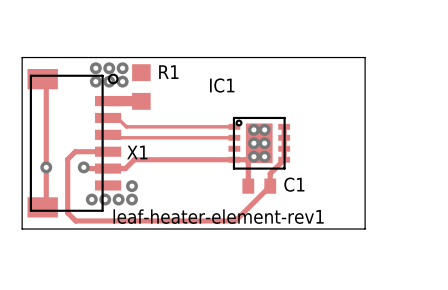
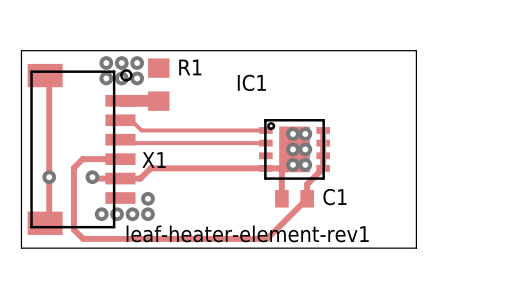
via: (253, 129) -> none
via: none -> (292, 133)
via: (264, 129) -> none
via: none -> (305, 133)
via: (253, 143) -> none
via: none -> (292, 149)
via: (264, 143) -> none
via: none -> (305, 149)
via: (253, 156) -> none
via: none -> (292, 164)
via: (264, 156) -> none
via: none -> (305, 164)

